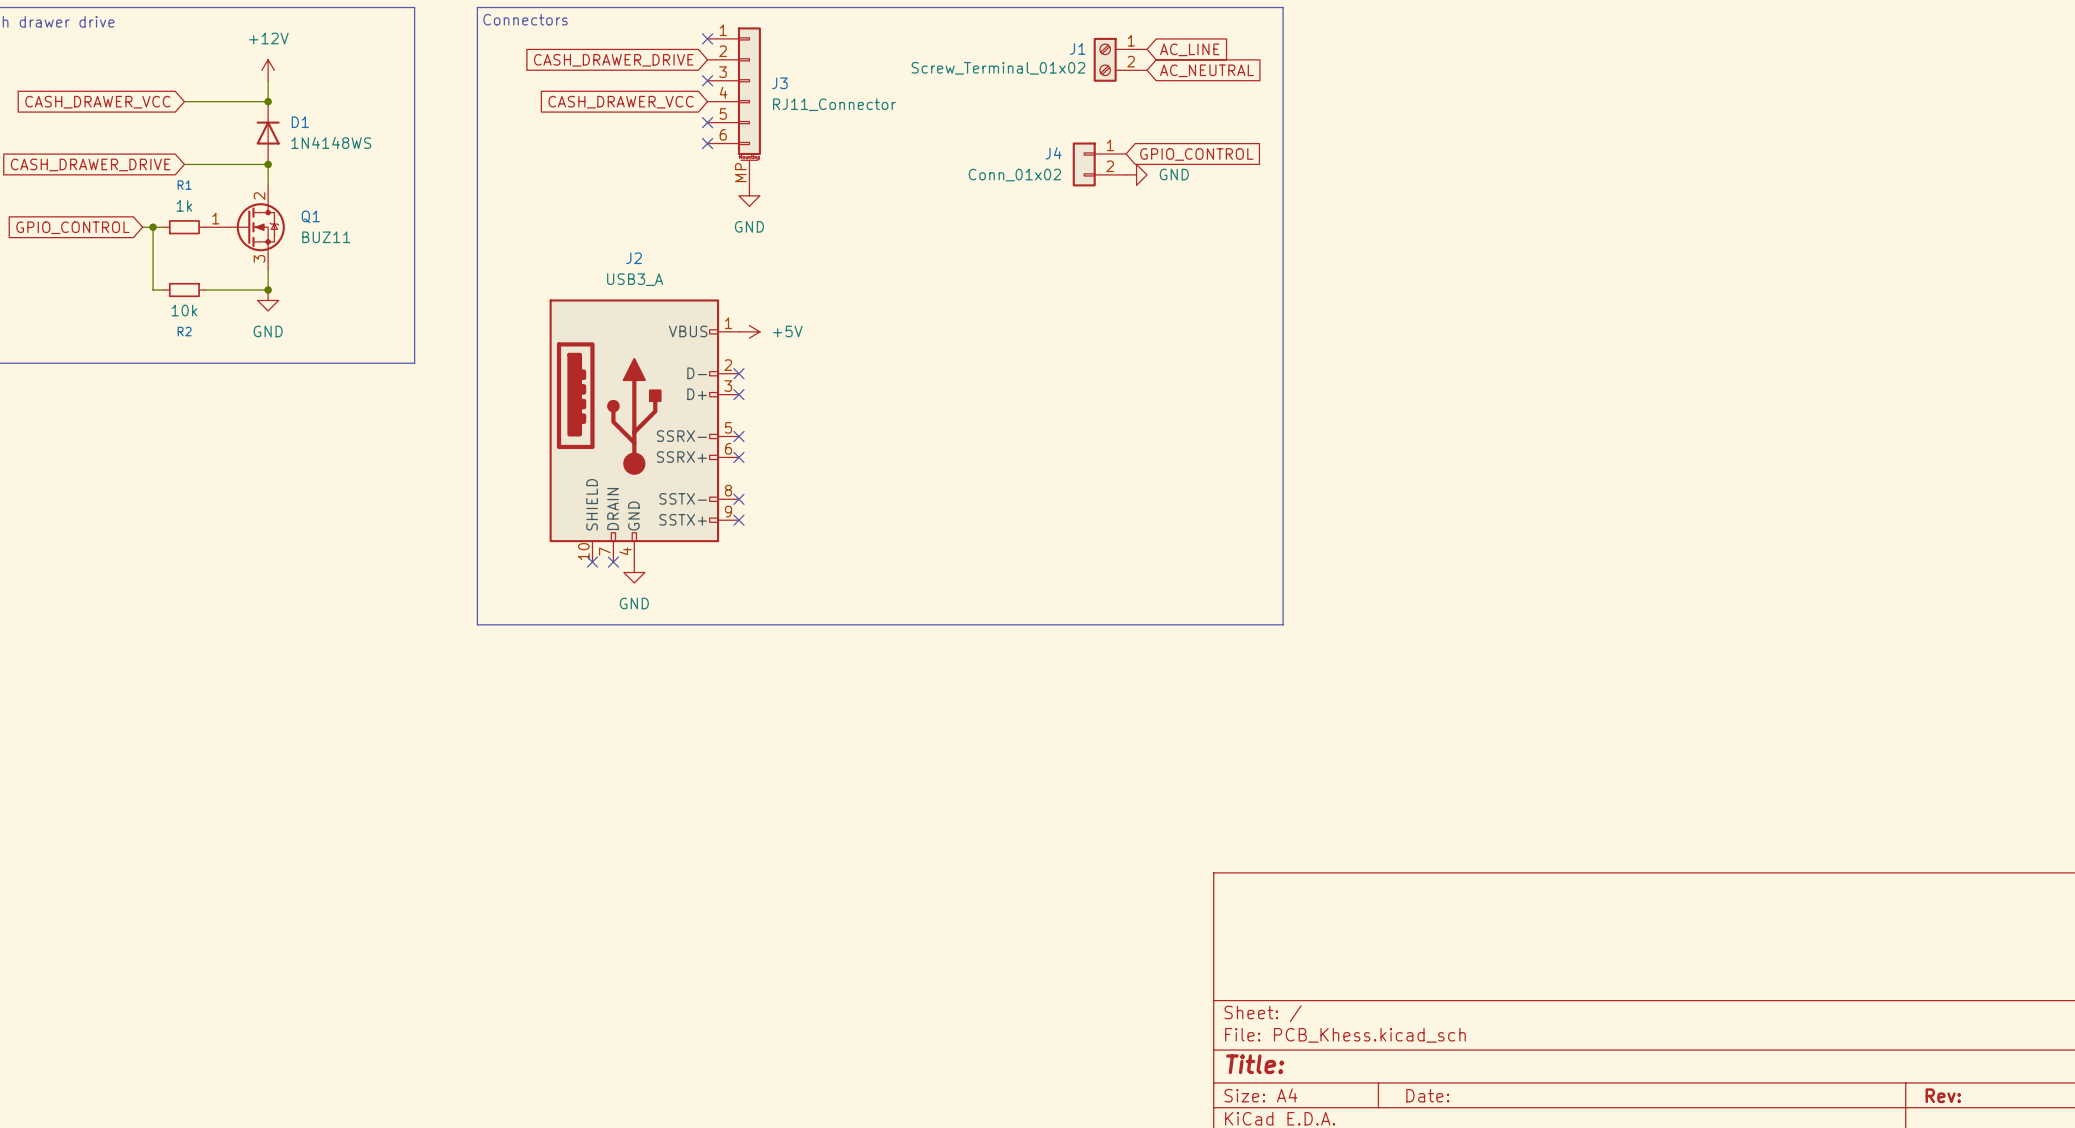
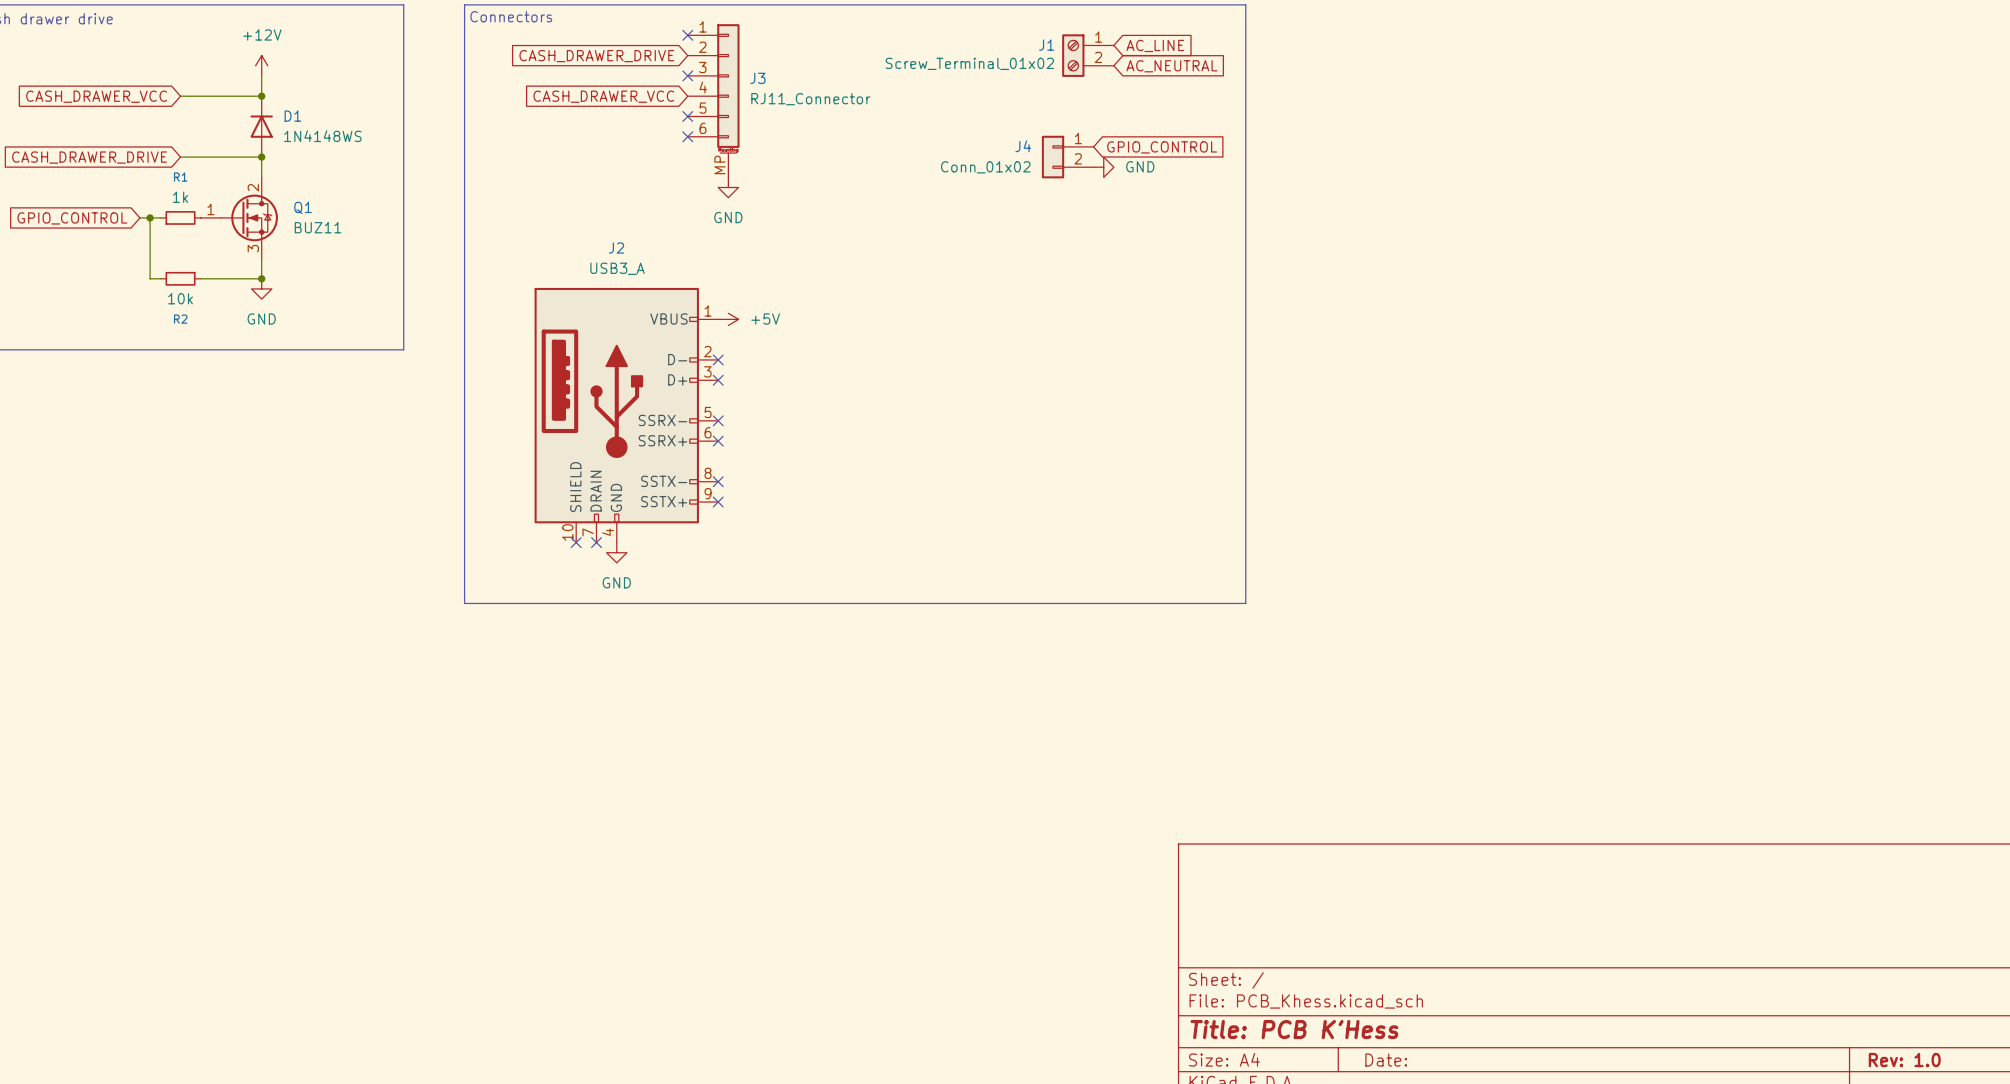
title block: Title: (1255, 1064) -> Title: PCB K'Hess (1294, 1029)
title block: Rev: (1943, 1095) -> Rev: 1.0 (1904, 1060)

